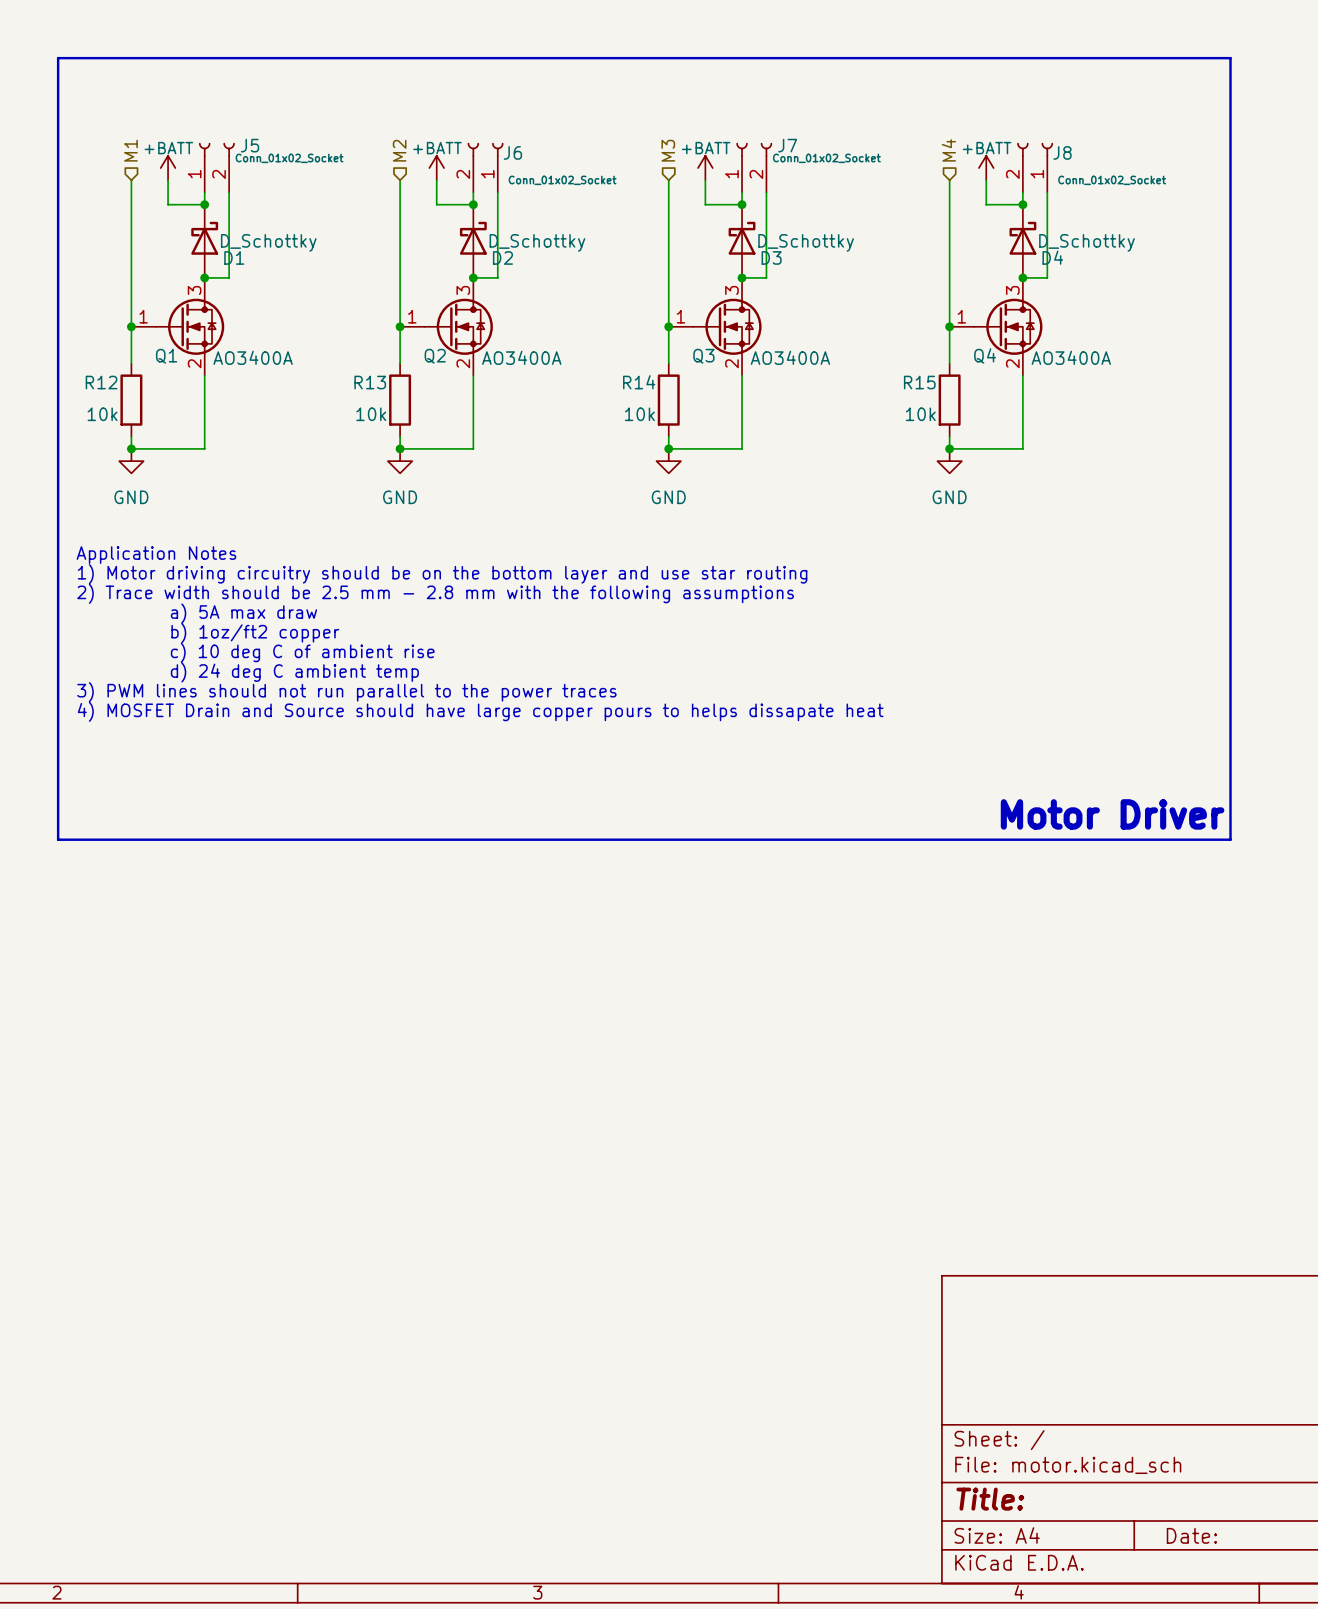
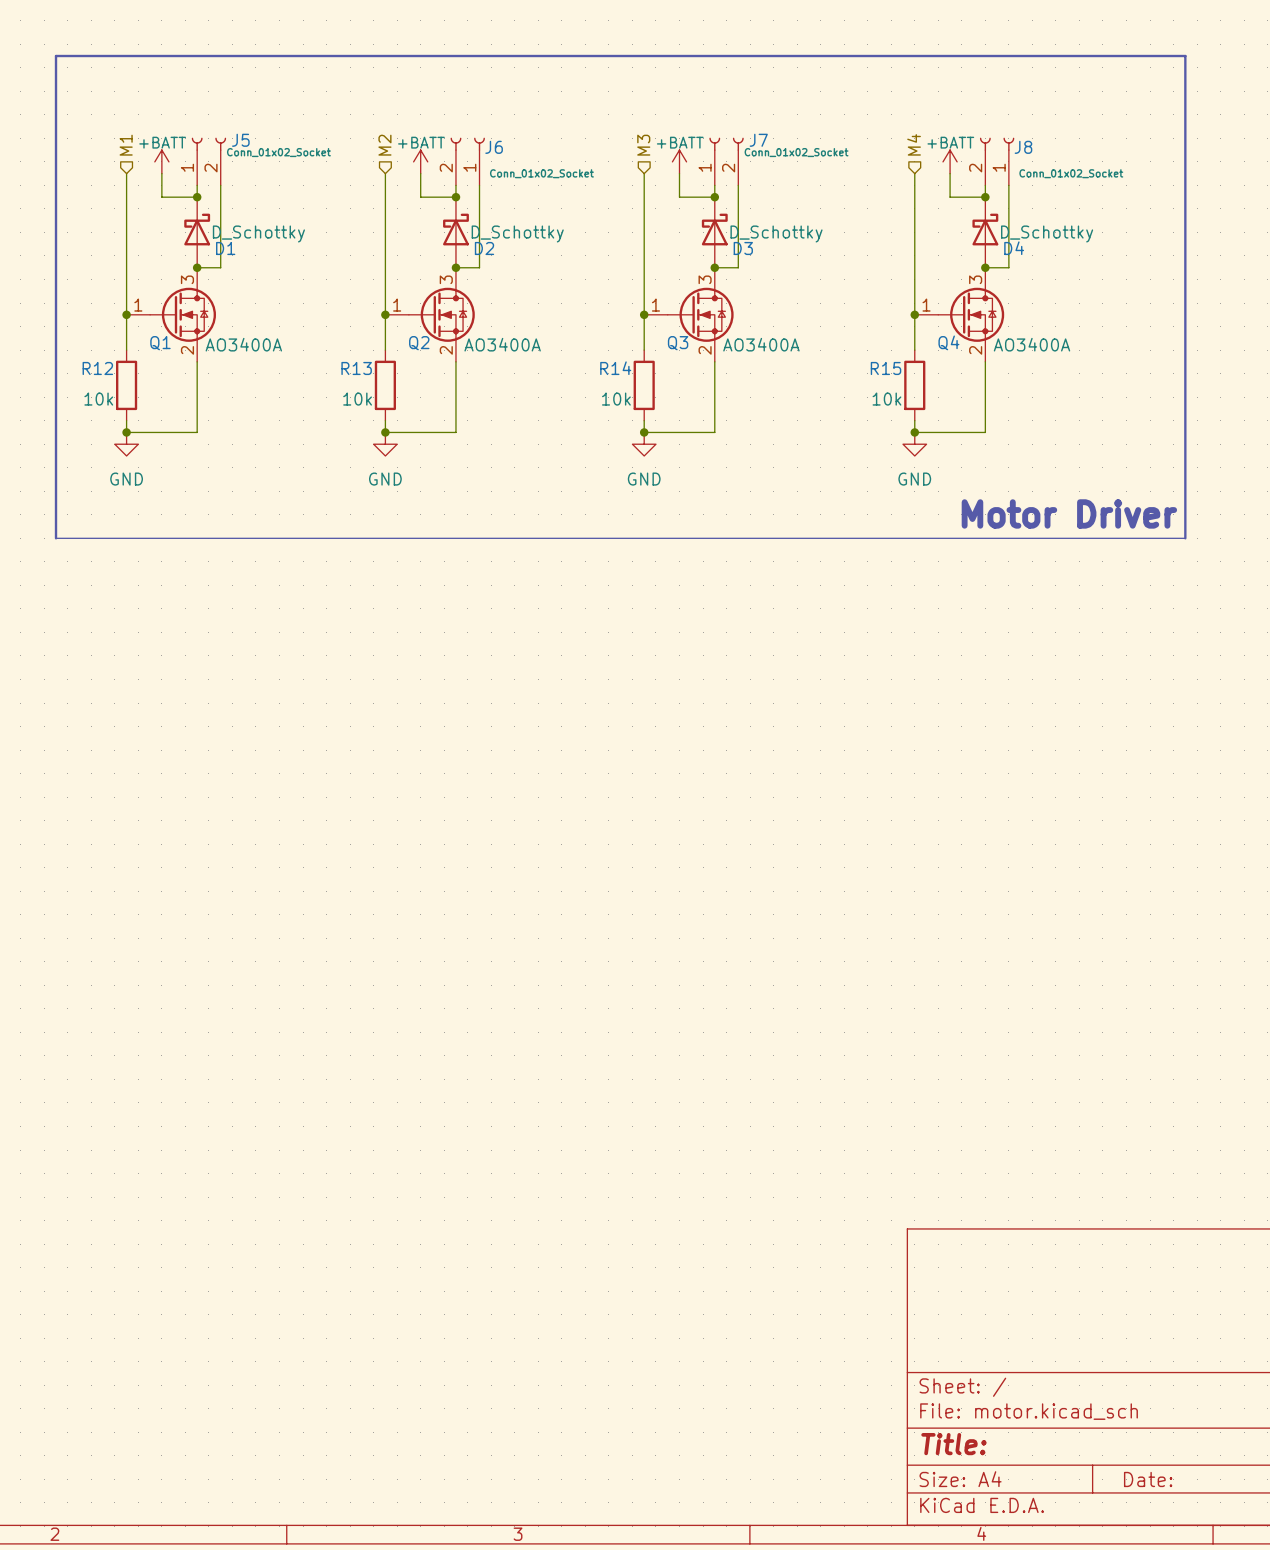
text: none -> Motor Driver (1069, 513)
text: Application Notes (156, 555) -> none
line: (58, 558) (58, 839) (1230, 839) (1230, 558) -> (56, 538) (1185, 538)
text: 1) Motor driving circuitry should be on the bottom layer and use star routing (442, 574) -> none
text: 2) Trace width should be 2.5 mm - 2.8 mm with the following assumptions (435, 593) -> none
text: a) 5A max draw (243, 613) -> none
text: b) 1oz/ft2 copper (255, 633) -> none
text: c) 10 deg C of ambient rise (302, 652) -> none
text: d) 24 deg C ambient temp (294, 672) -> none
text: 3) PWM lines should not run parallel to the power traces (346, 692) -> none
text: 4) MOSFET Drain and Source should have large copper pours to helps dissapate heat (480, 711) -> none
text: Motor Driver (1112, 814) -> none

